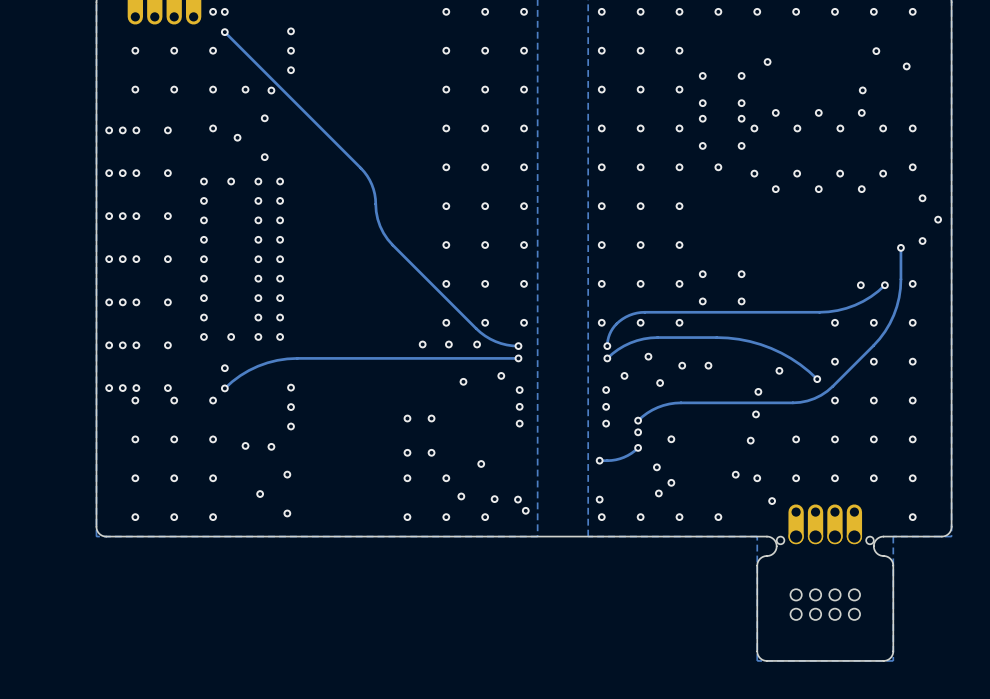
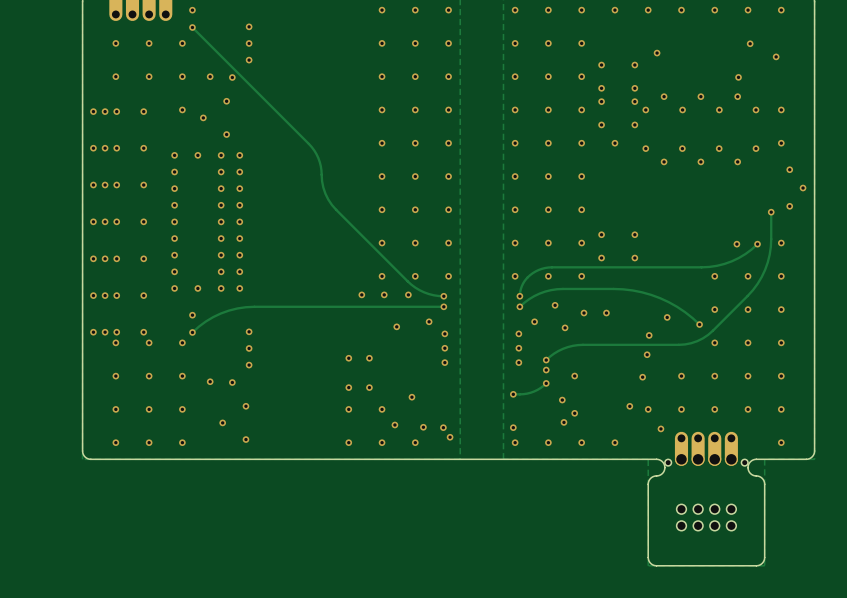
via: (213, 11) -> none

